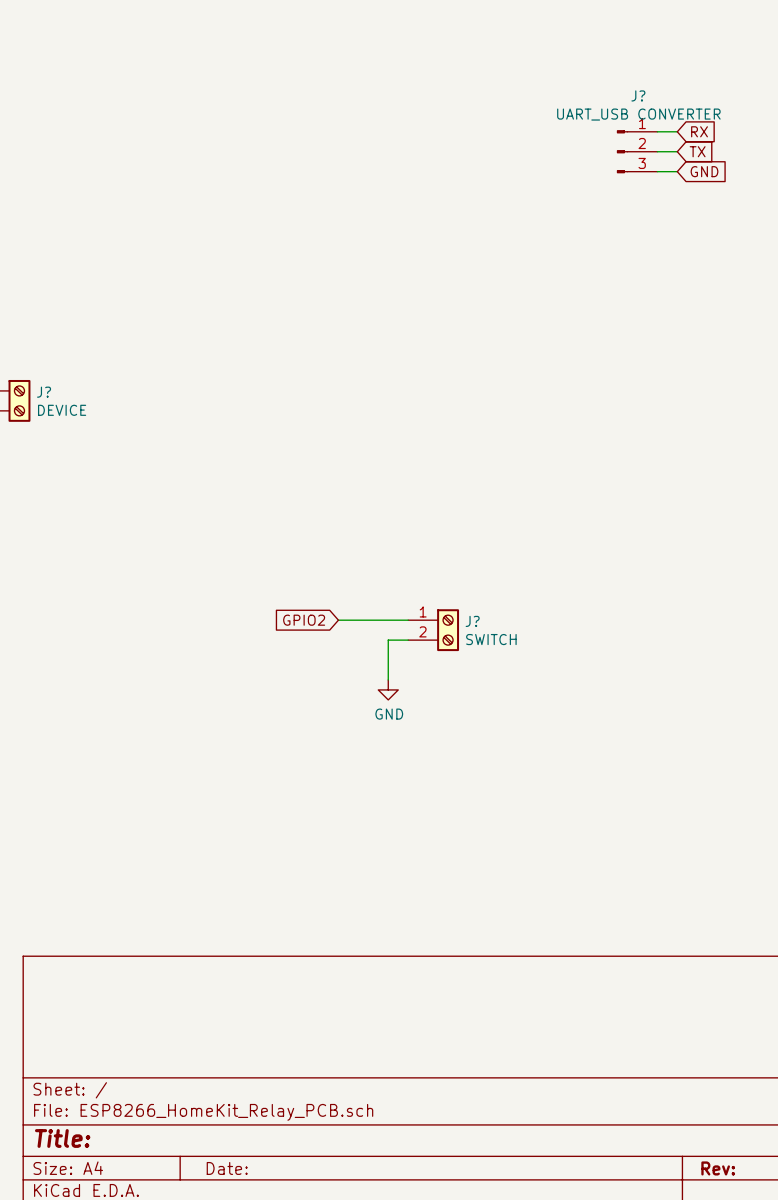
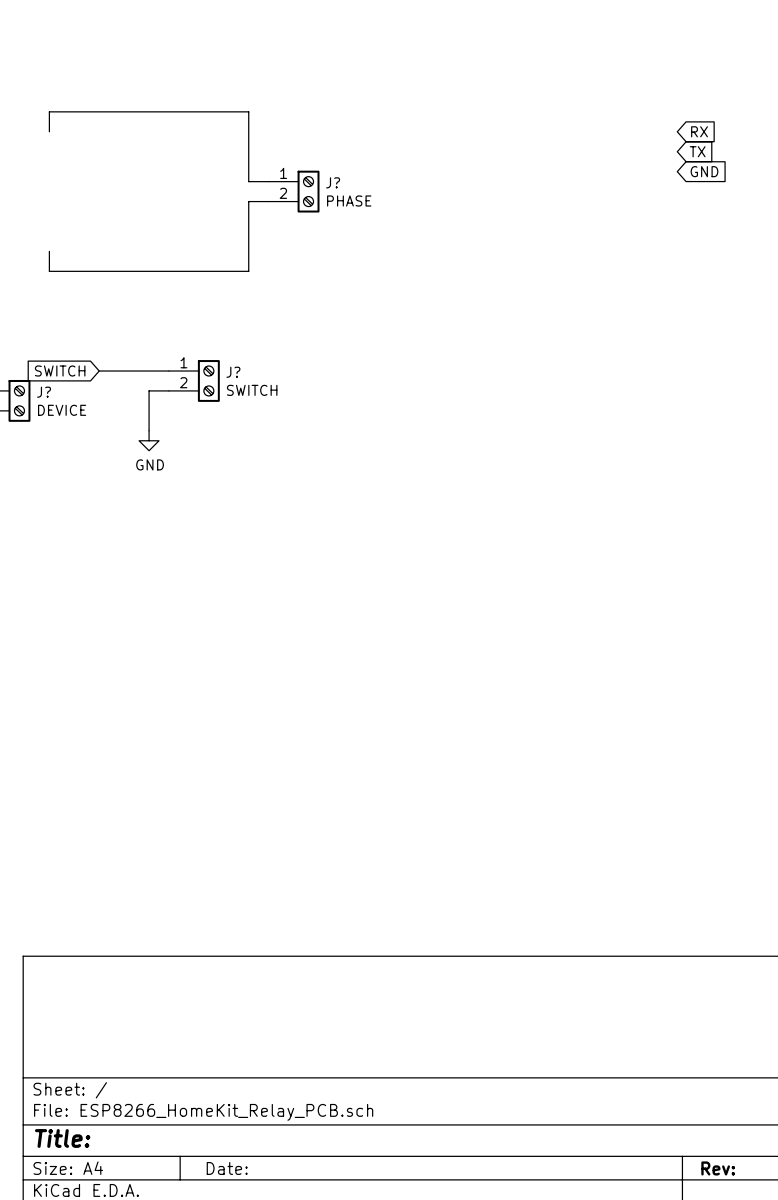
wire: none -> (49, 131) (49, 111) (248, 111) (248, 181) (268, 181)
wire: (657, 131) (677, 131) -> none
J?: UART_USB CONVERTER (637, 151) -> none
wire: (657, 151) (677, 151) -> none
wire: (657, 171) (677, 171) -> none
J?: none -> PHASE (294, 191)
wire: none -> (268, 201) (248, 201) (248, 271) (49, 271) (49, 251)
global label: none -> SWITCH (60, 371)
wire: none -> (99, 371) (168, 371)
J?: none -> SWITCH (194, 380)
wire: none -> (168, 390) (149, 390) (149, 430)
power symbol: none -> GND (149, 440)
global label: GPIO2 (304, 620) -> none
wire: (338, 620) (408, 620) -> none
J?: SWITCH (433, 630) -> none
wire: (408, 640) (388, 640) (388, 679) -> none
power symbol: GND (388, 689) -> none

